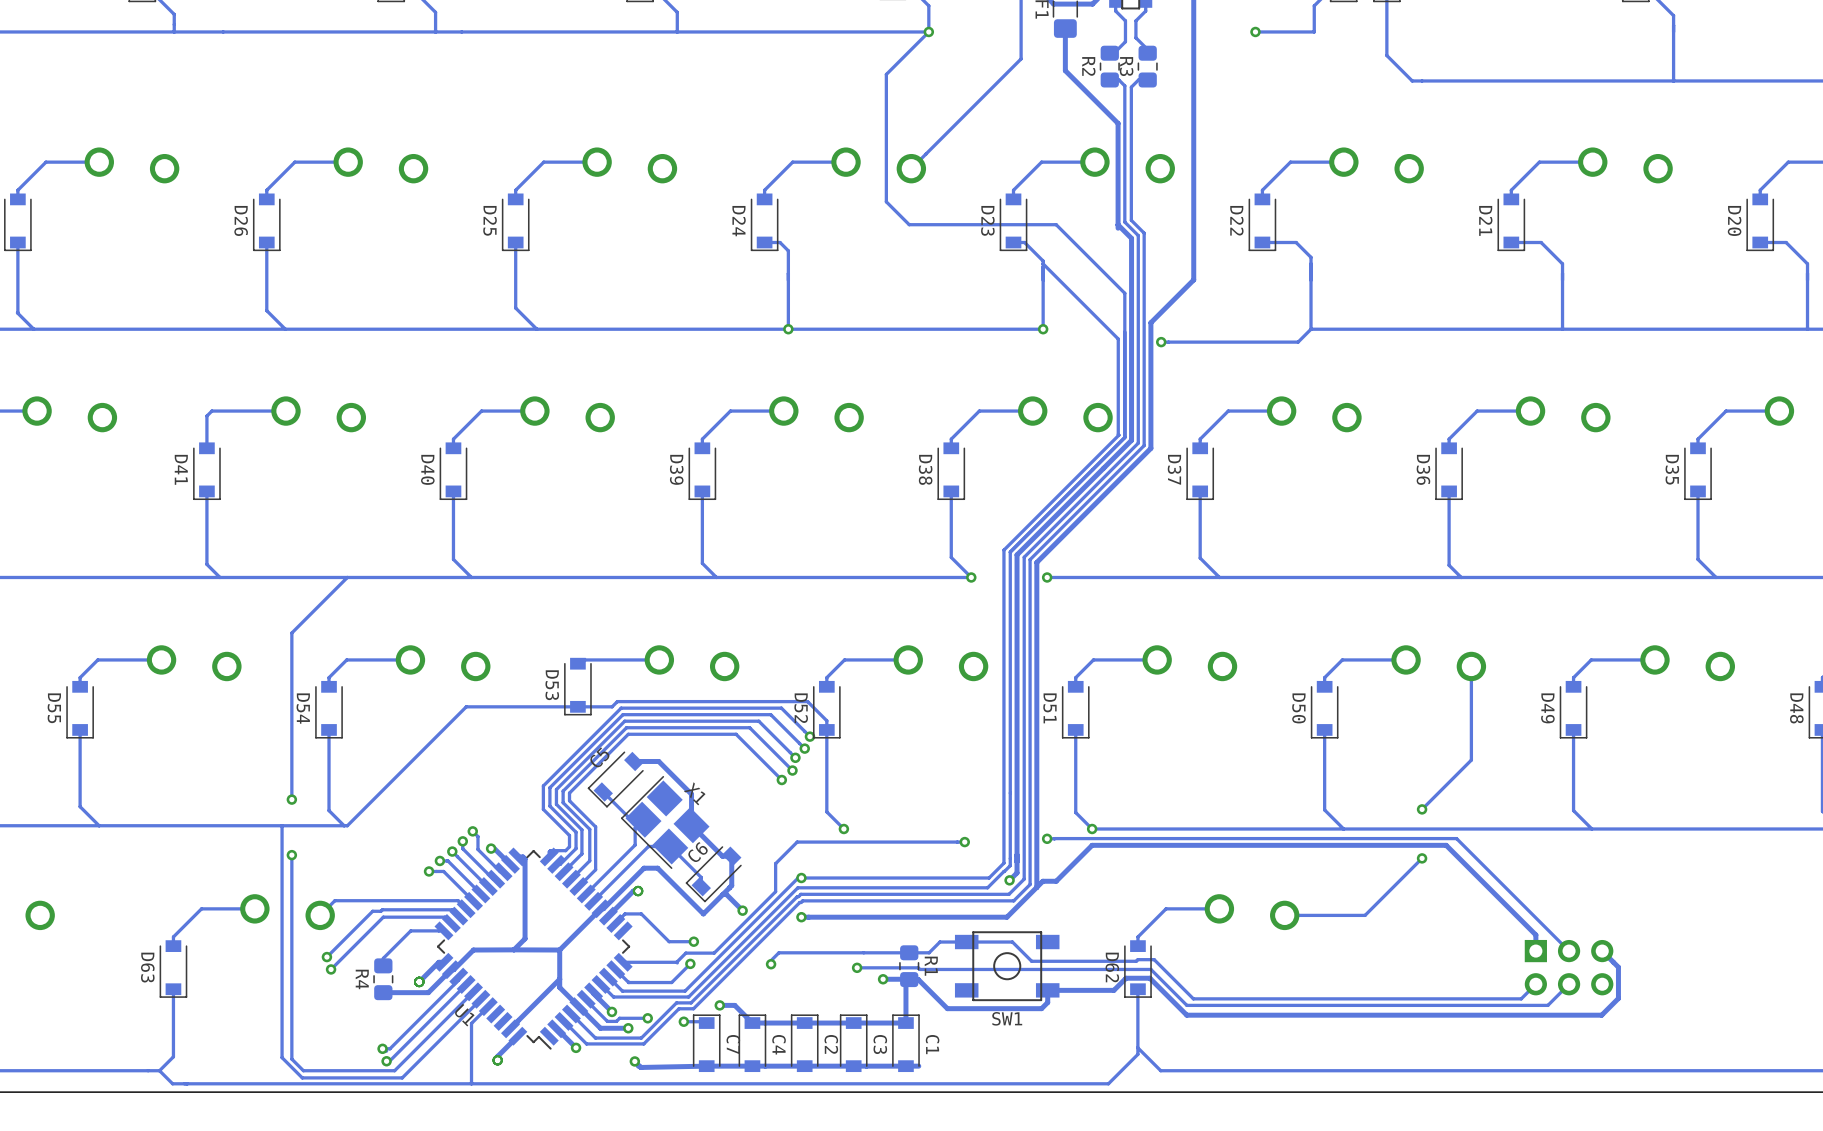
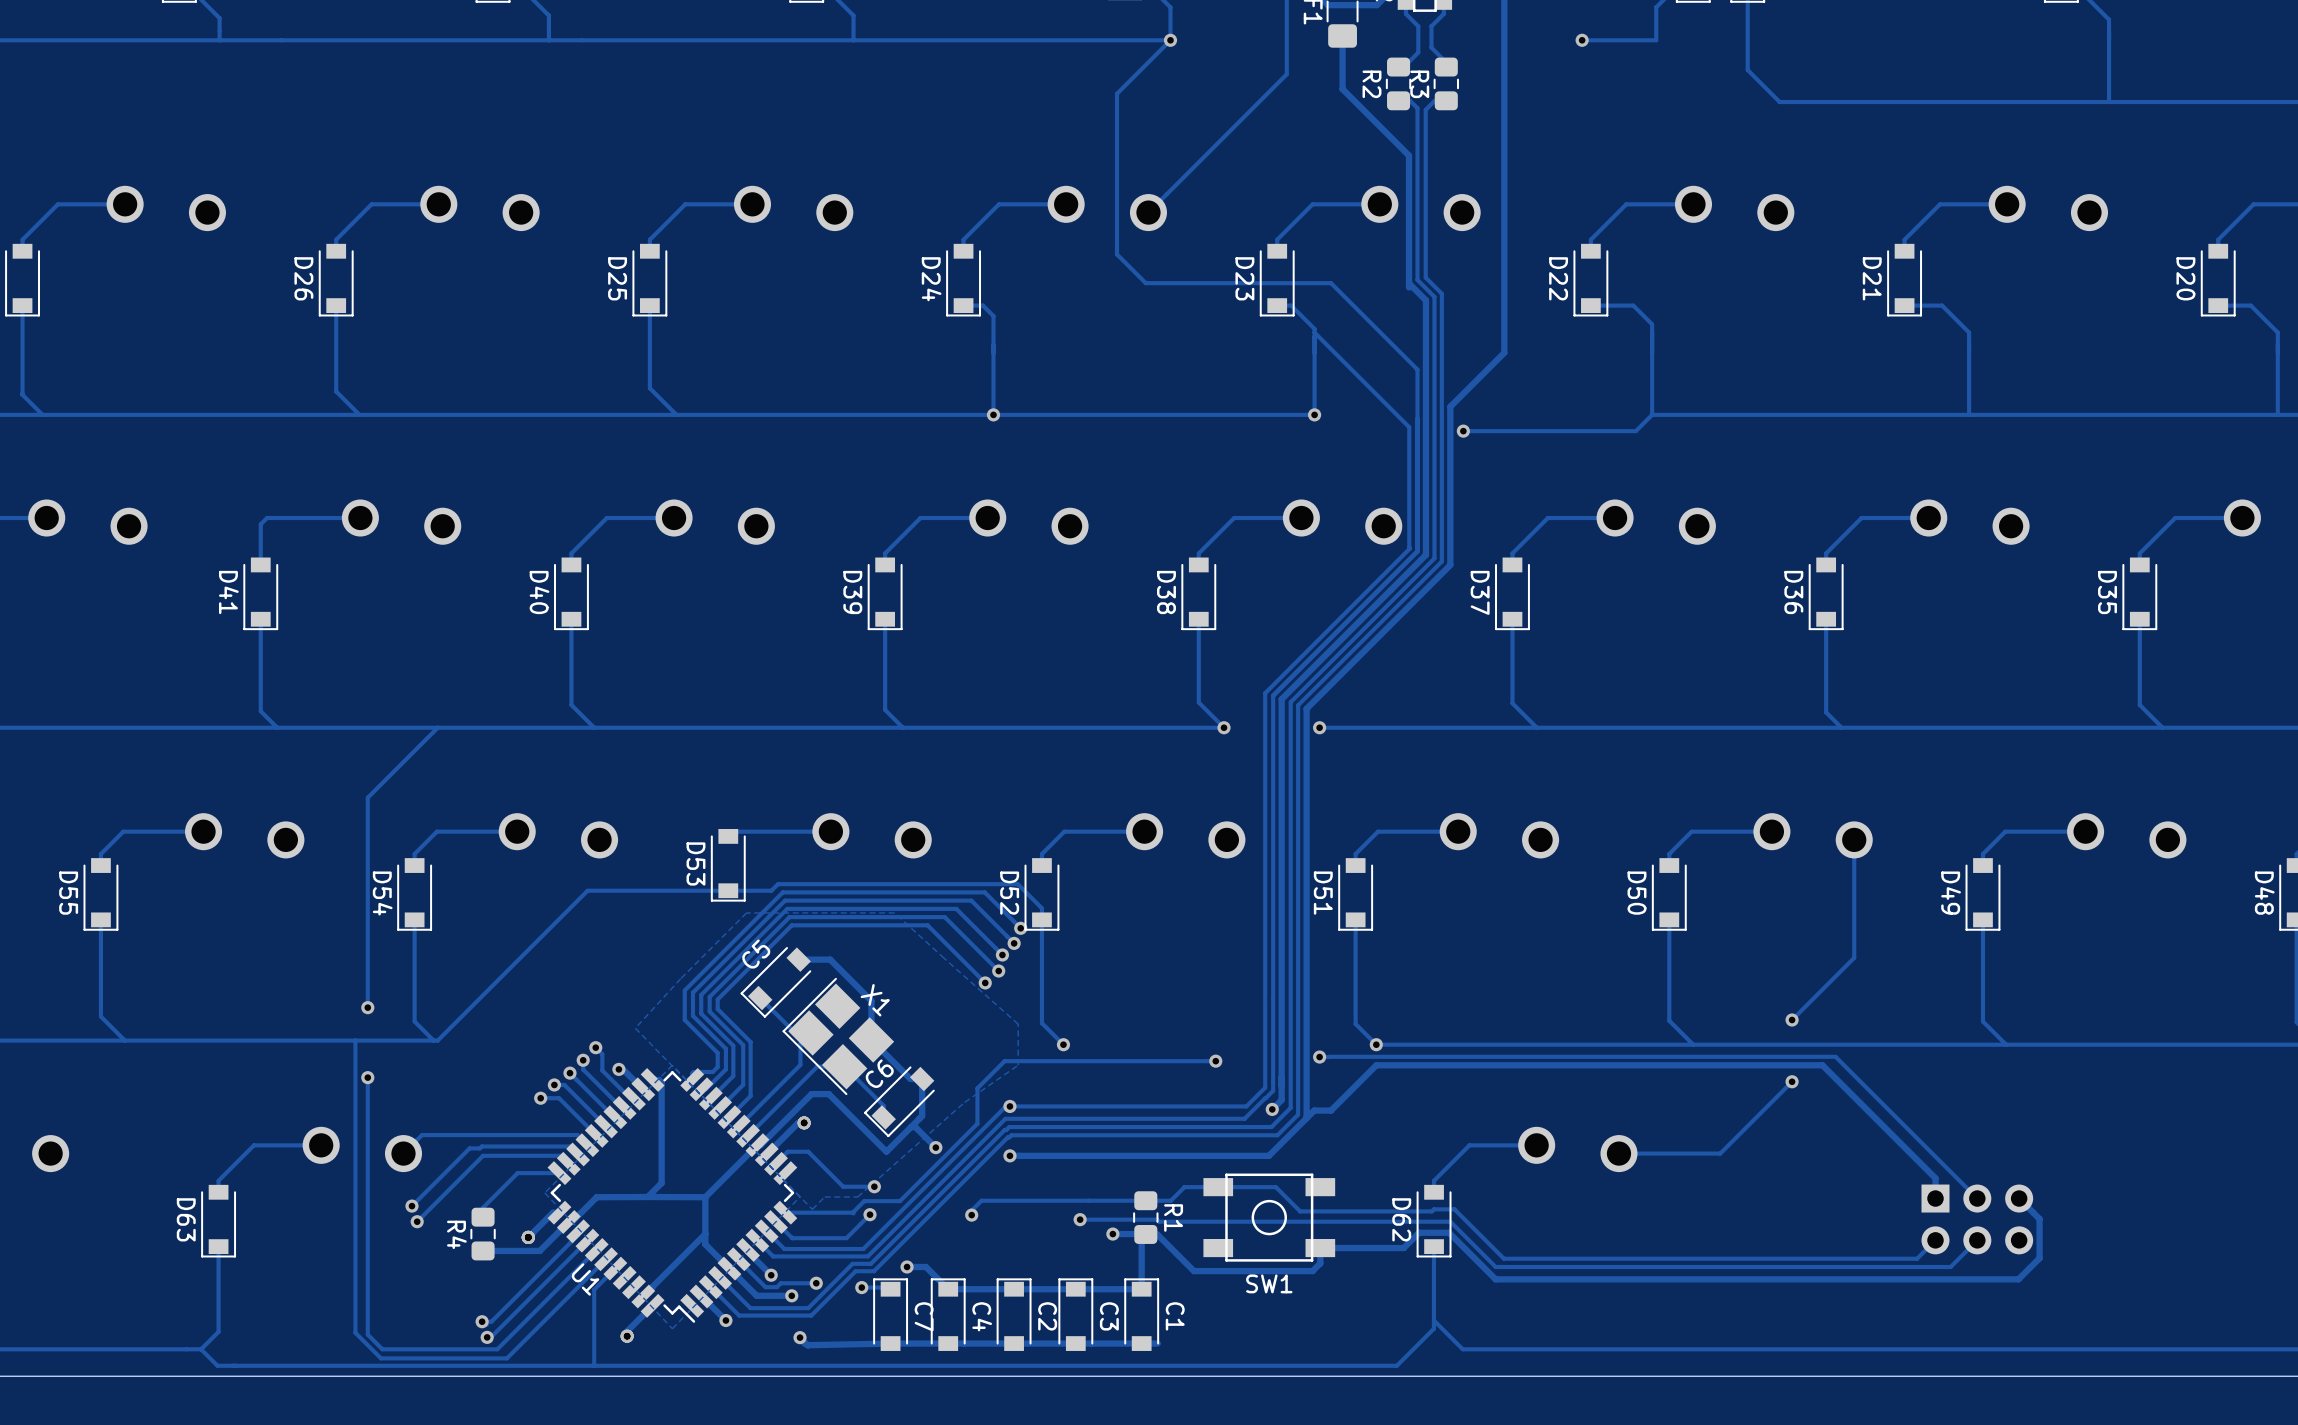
zone outline: none -> (894, 912) (1018, 1024) (1018, 1065) (964, 1102) (857, 1197) (824, 1197) (812, 1209) (635, 1028) (680, 978) (746, 912) (894, 912)
zone outline: none -> (672, 1065) (800, 1197) (672, 1328) (544, 1192) (672, 1065)

